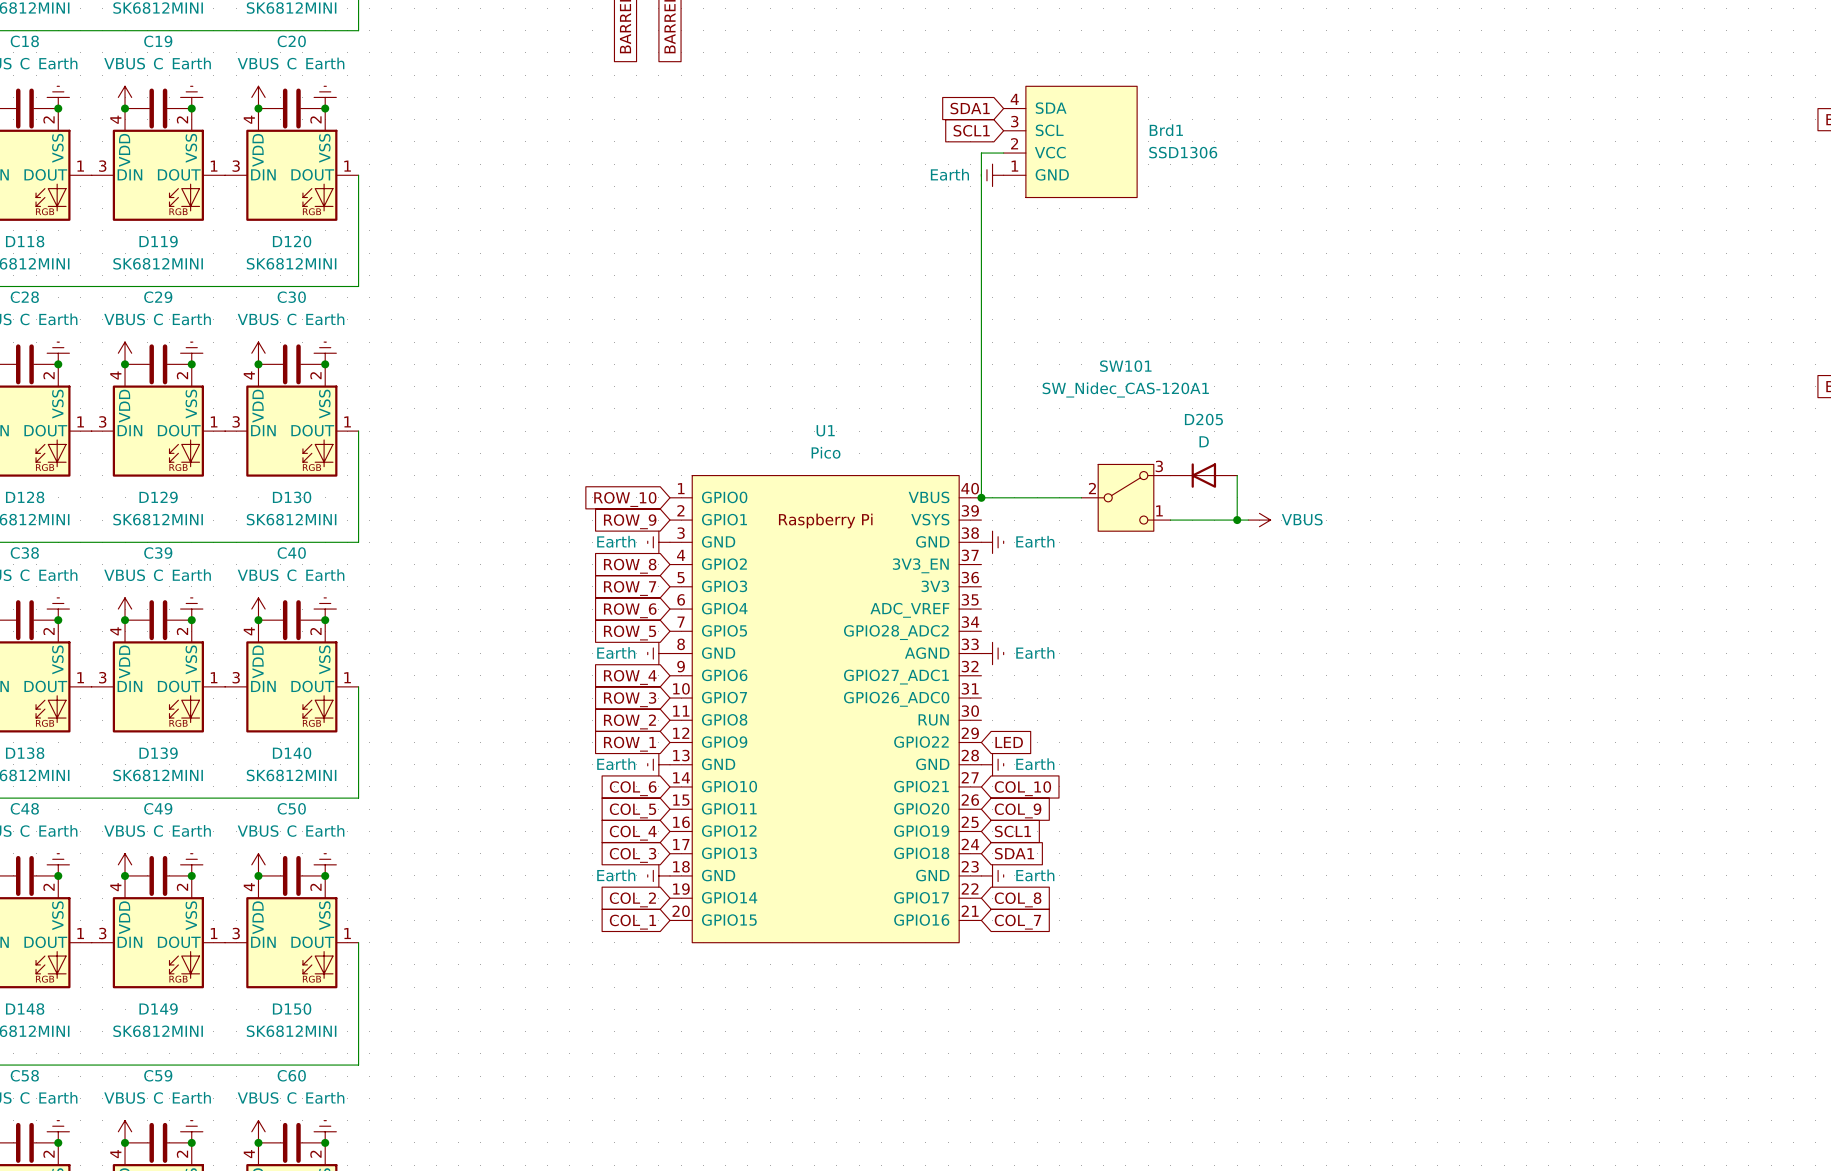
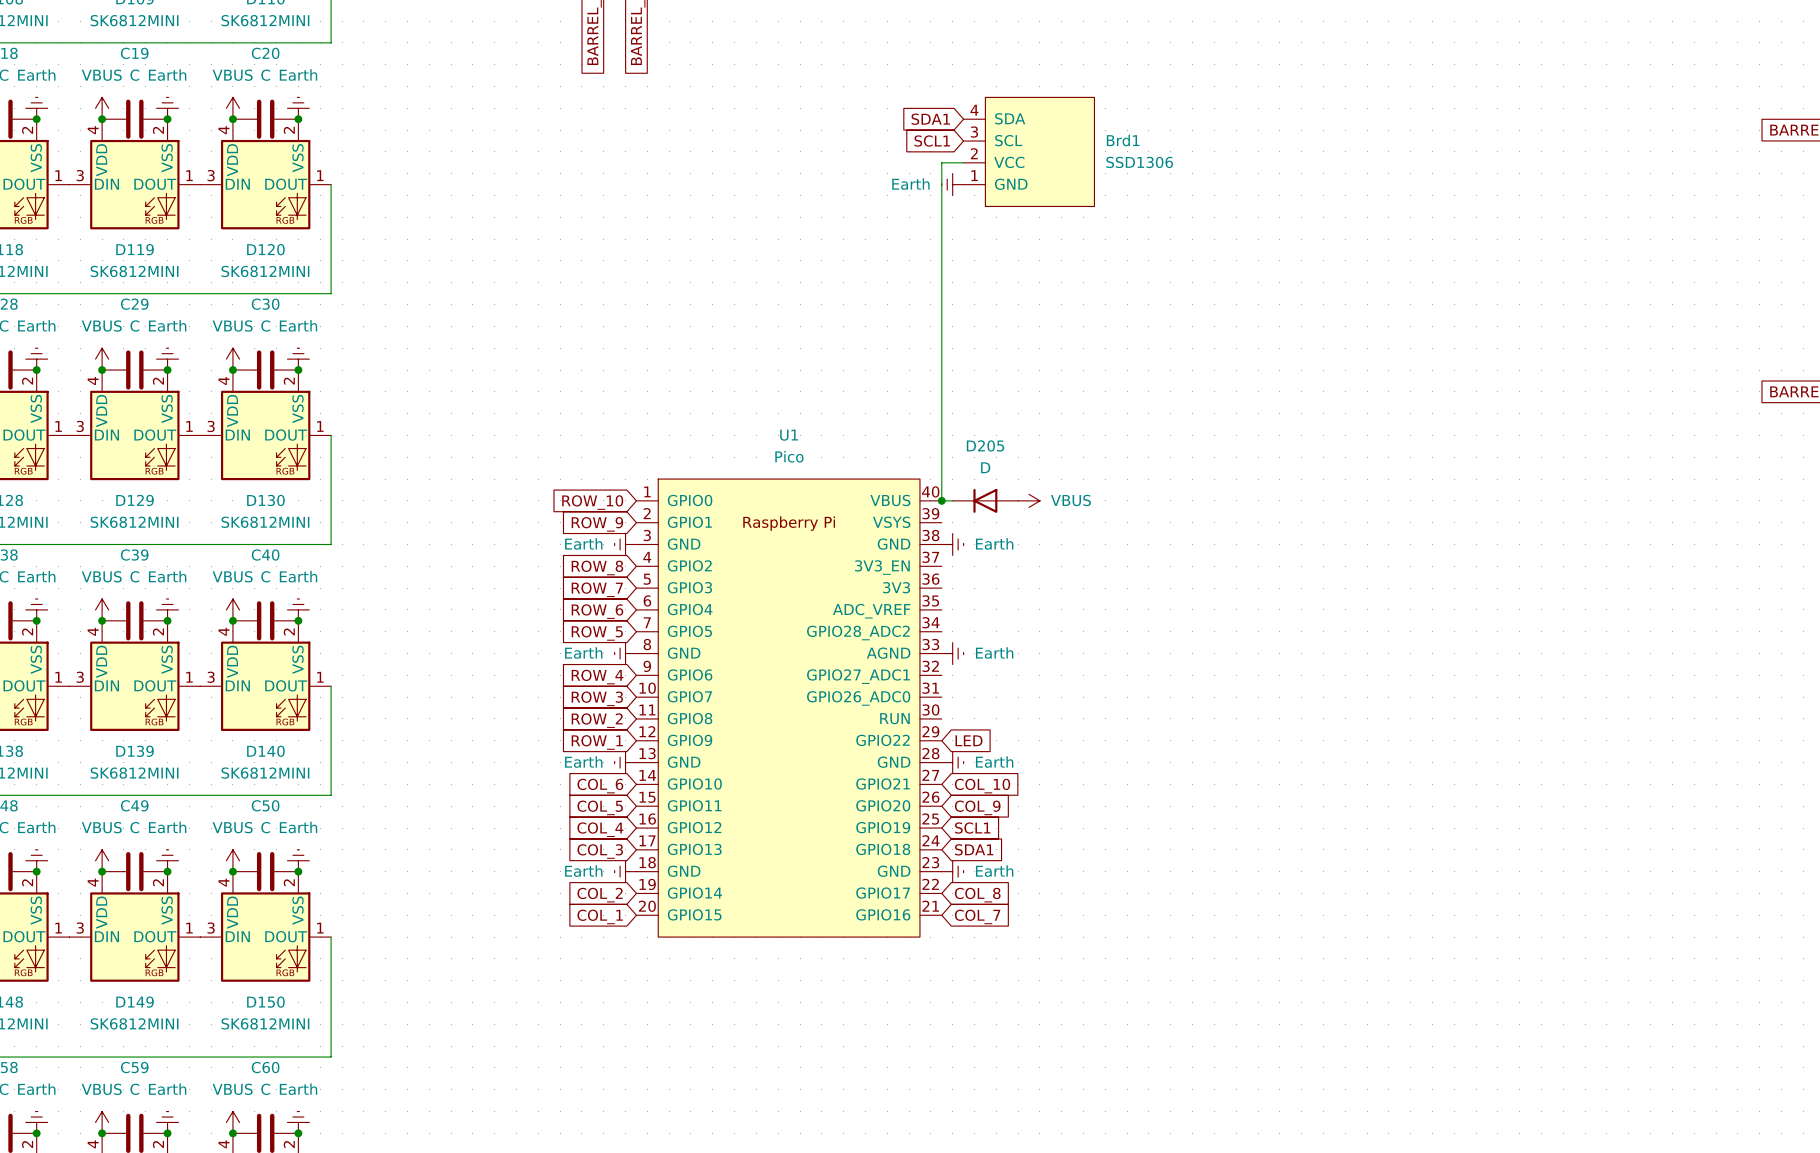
D205 position: (1203, 475) -> (985, 500)
wire: (1237, 475) (1237, 520) -> none
SW101: SW_Nidec_CAS-120A1 (1125, 497) -> none
wire: (1170, 520) (1248, 520) -> none
junction: (1237, 520) -> none
power symbol position: VBUS (1259, 520) -> VBUS (1029, 500)

